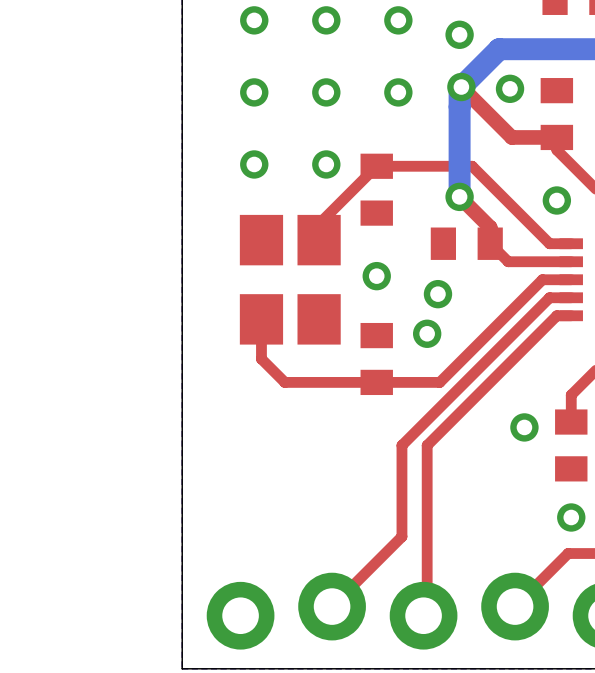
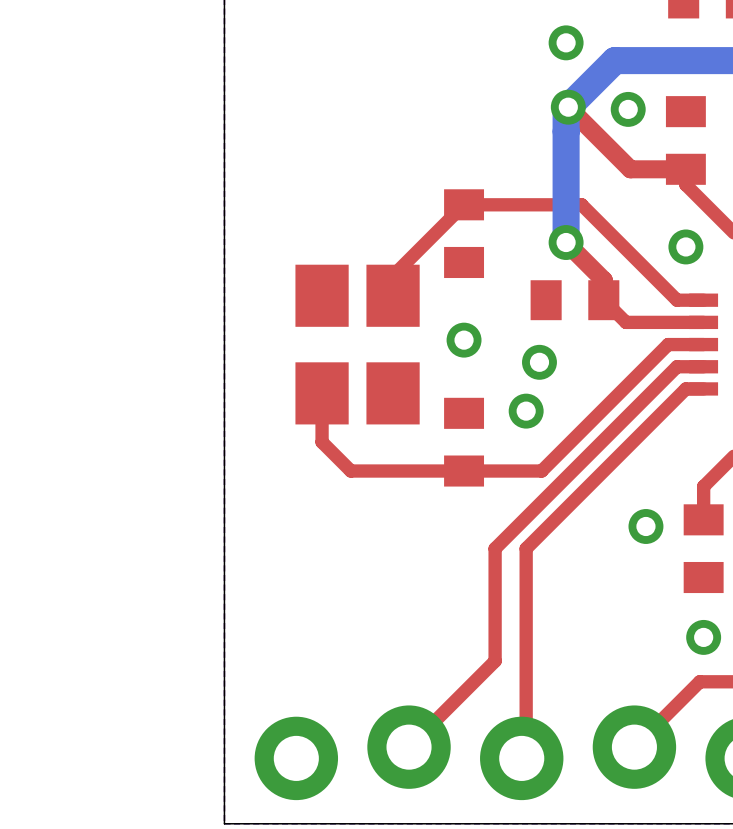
via: (254, 20) -> none
via: (326, 20) -> none
via: (398, 20) -> none
via: (254, 92) -> none
via: (326, 92) -> none
via: (398, 92) -> none
via: (254, 164) -> none
via: (326, 164) -> none

